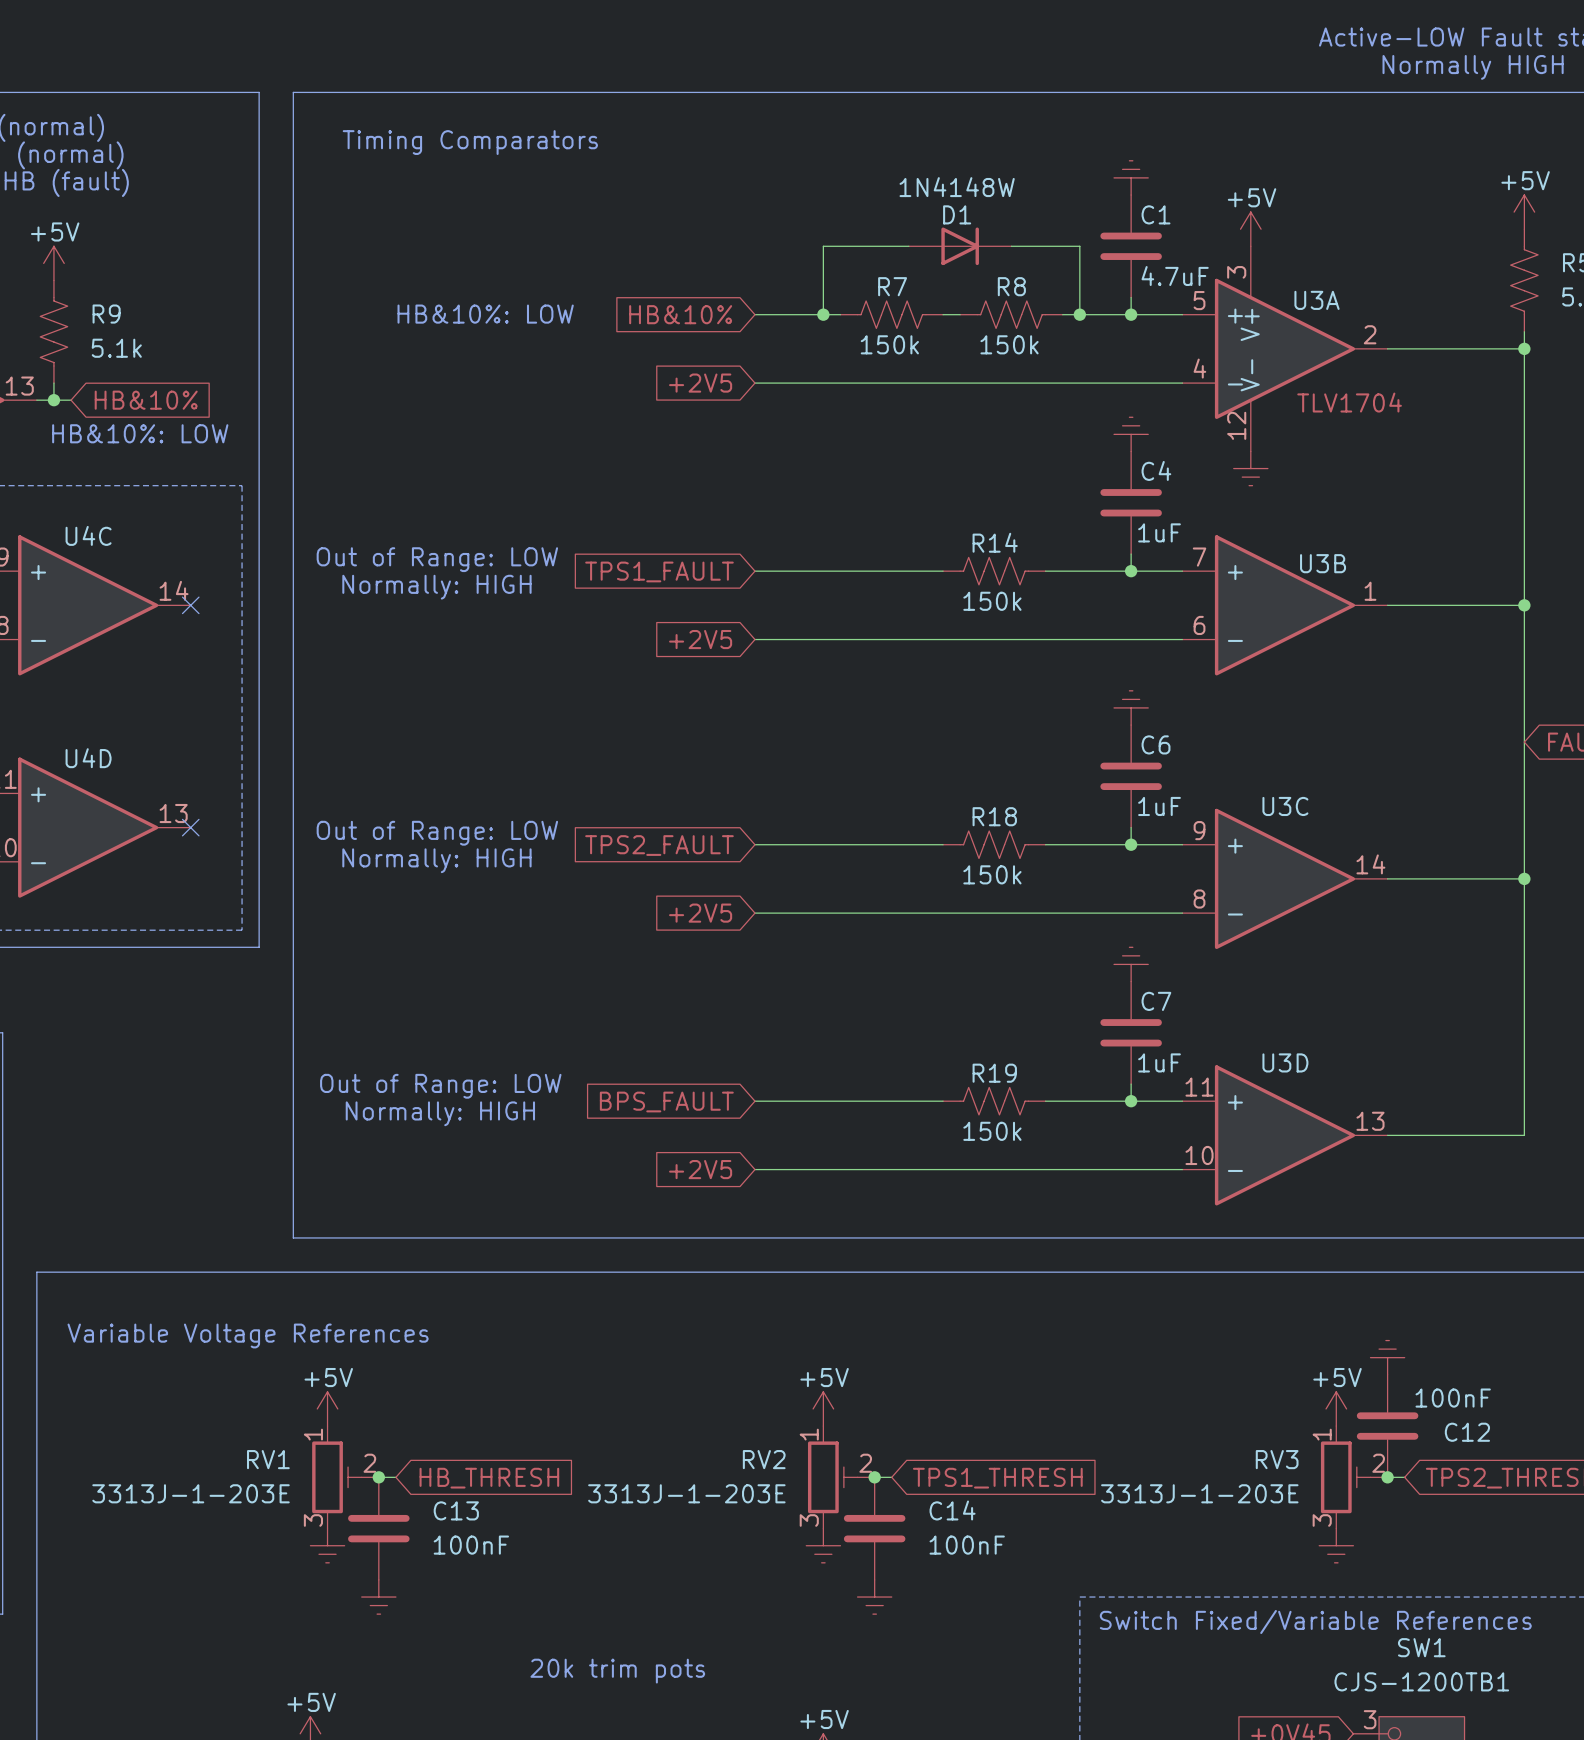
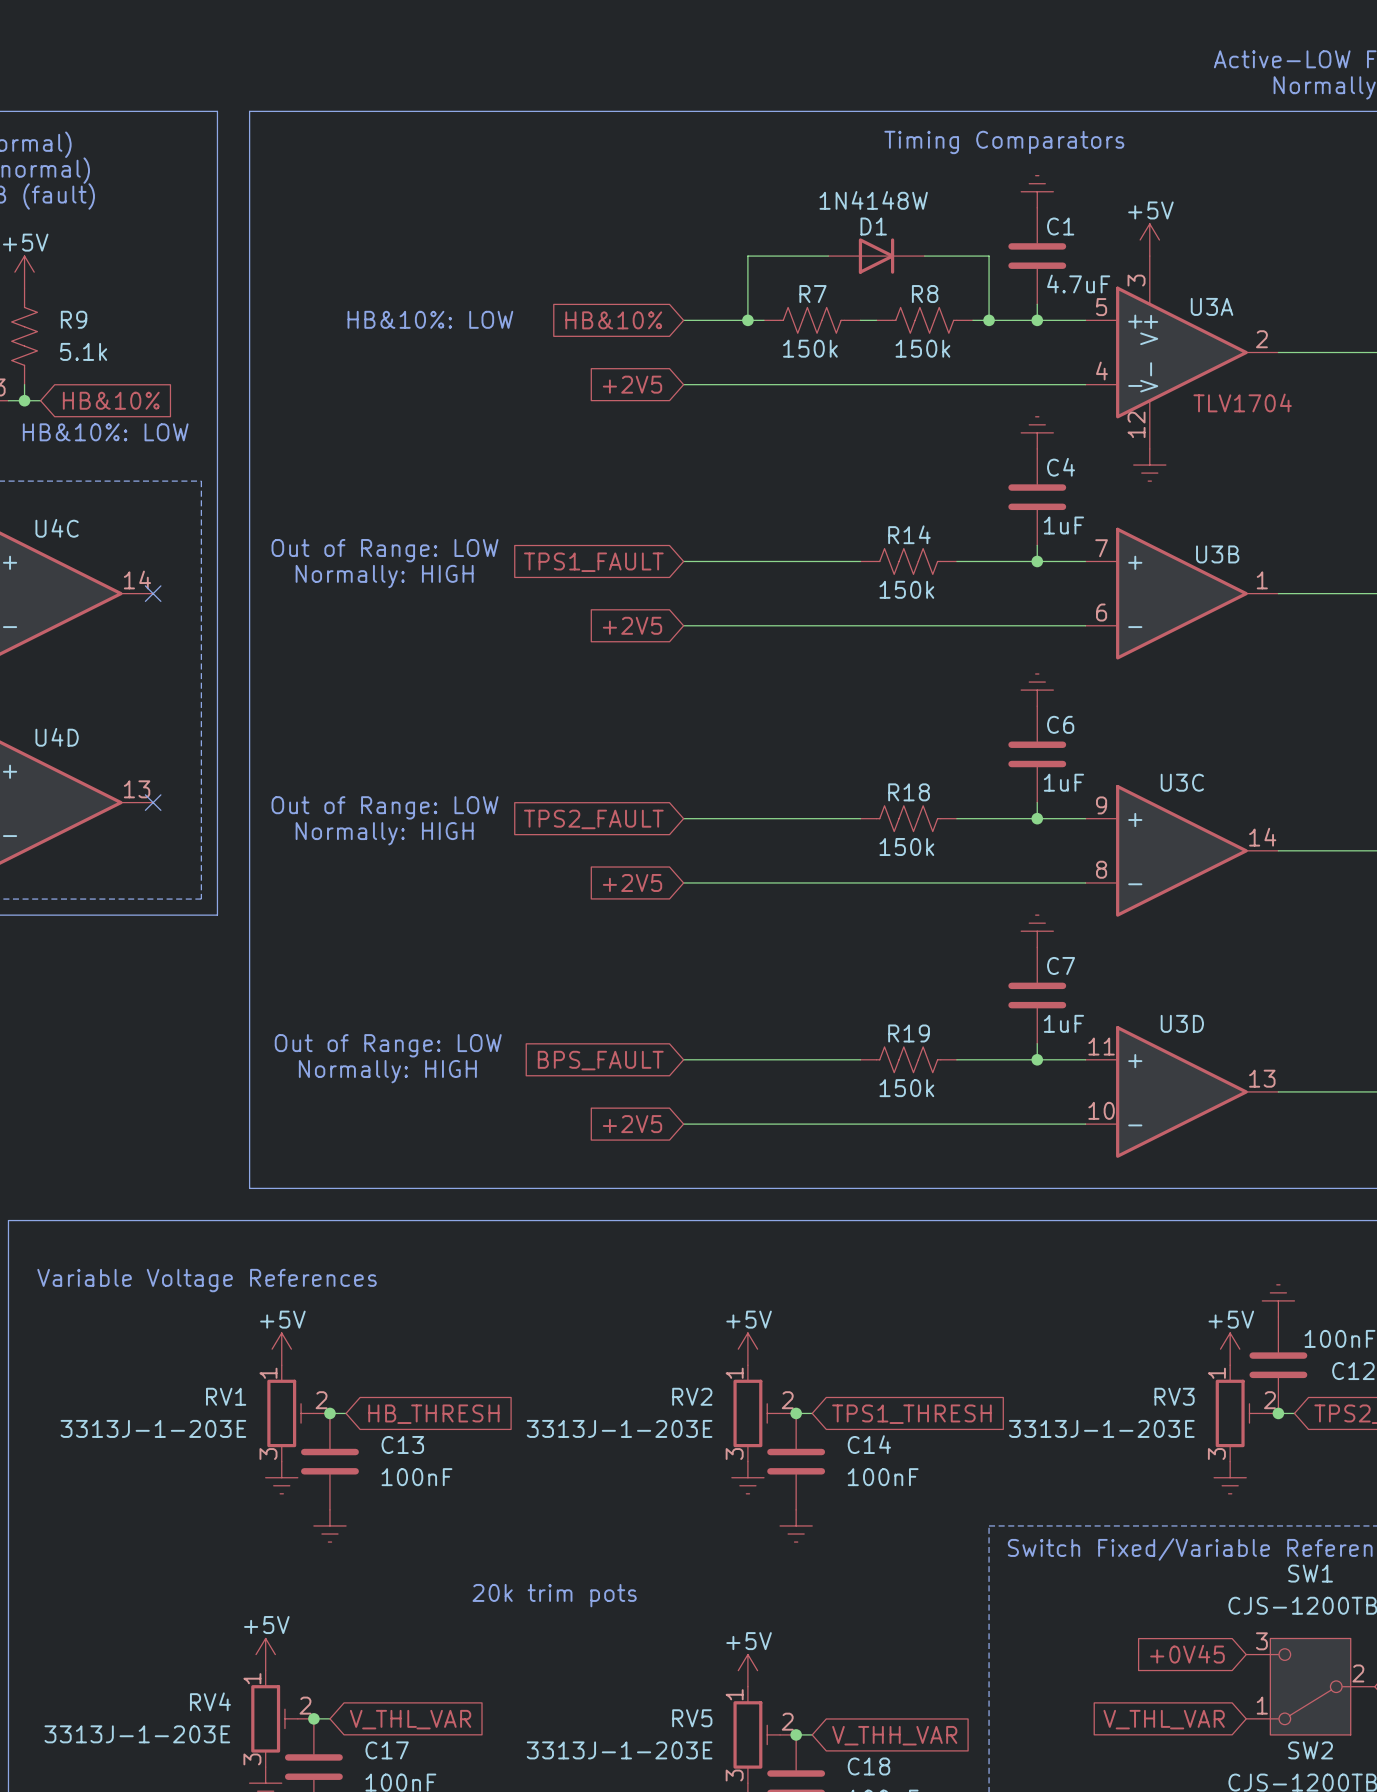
text: none -> Timing Comparators (1004, 142)
text: Timing Comparators (470, 142) -> none

